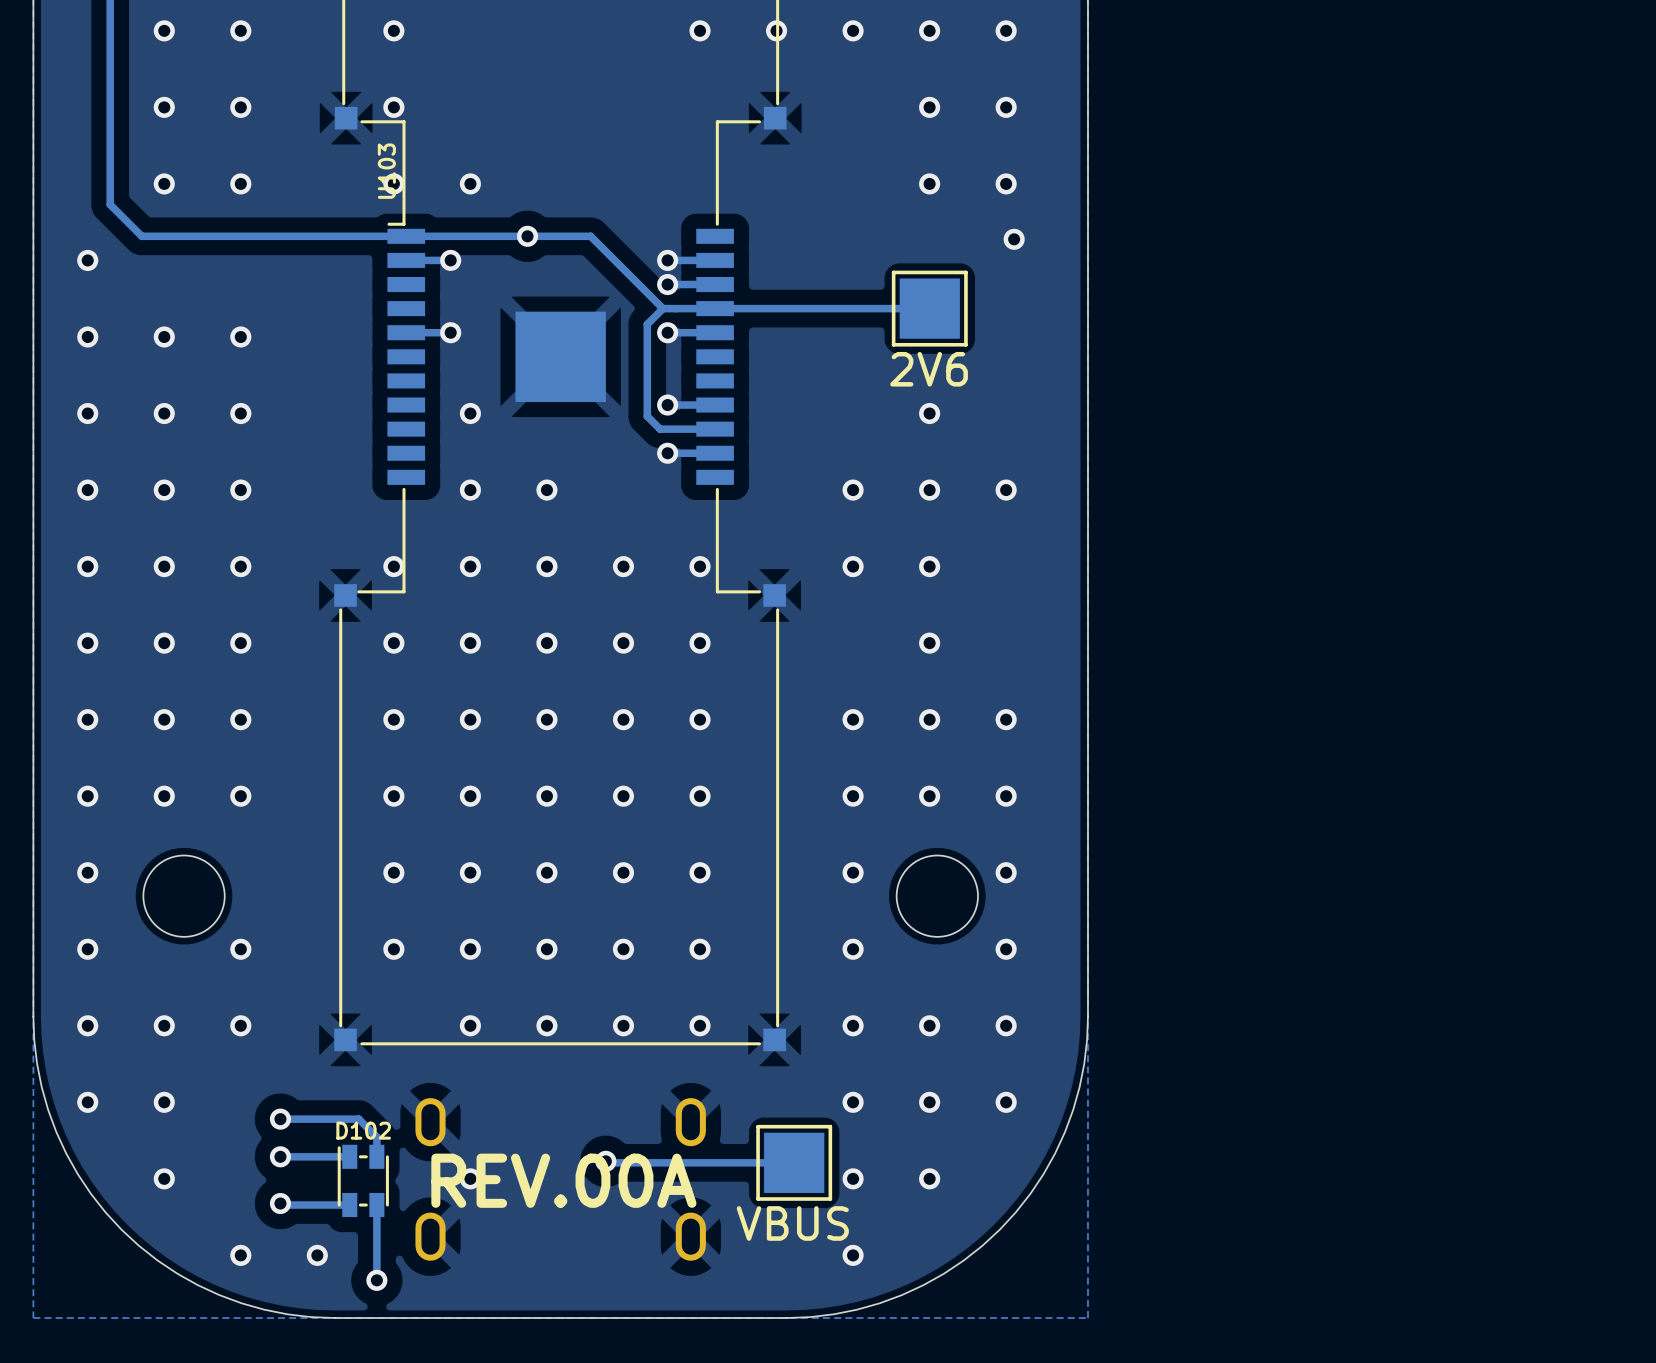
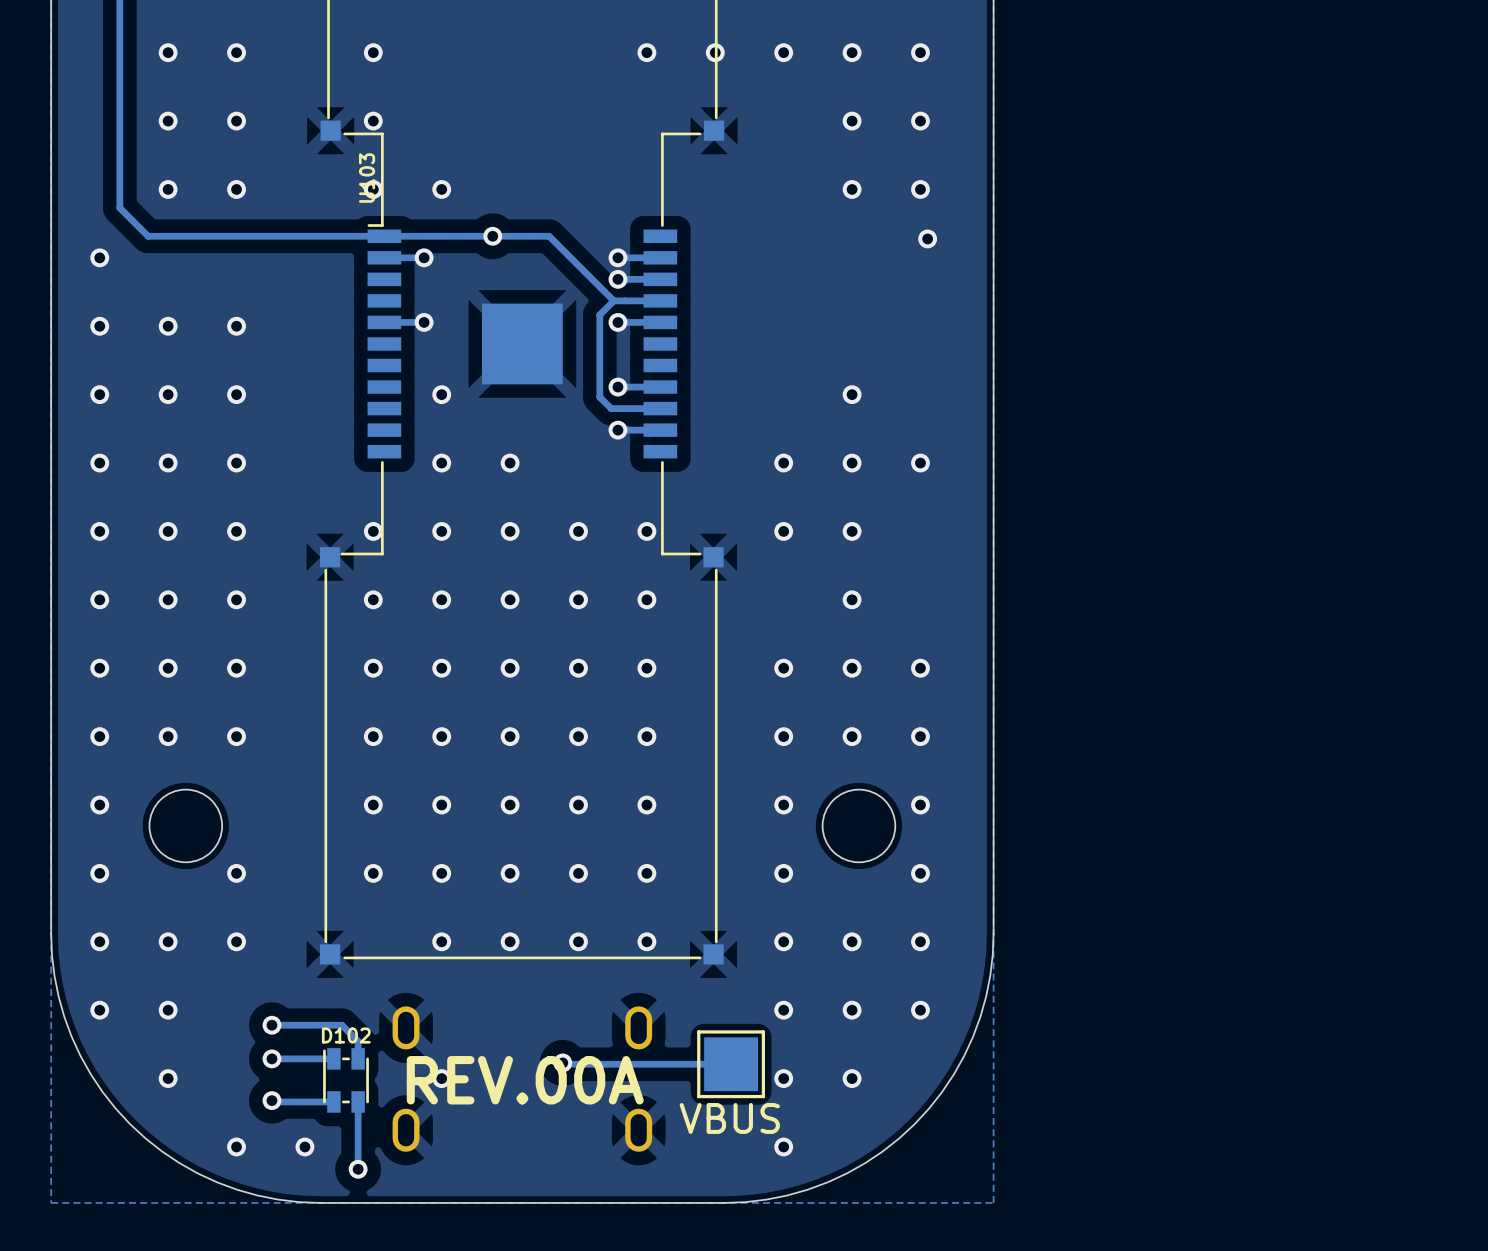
track: (929, 308) (715, 308) -> none
part: 2V6 (929, 308) -> none

